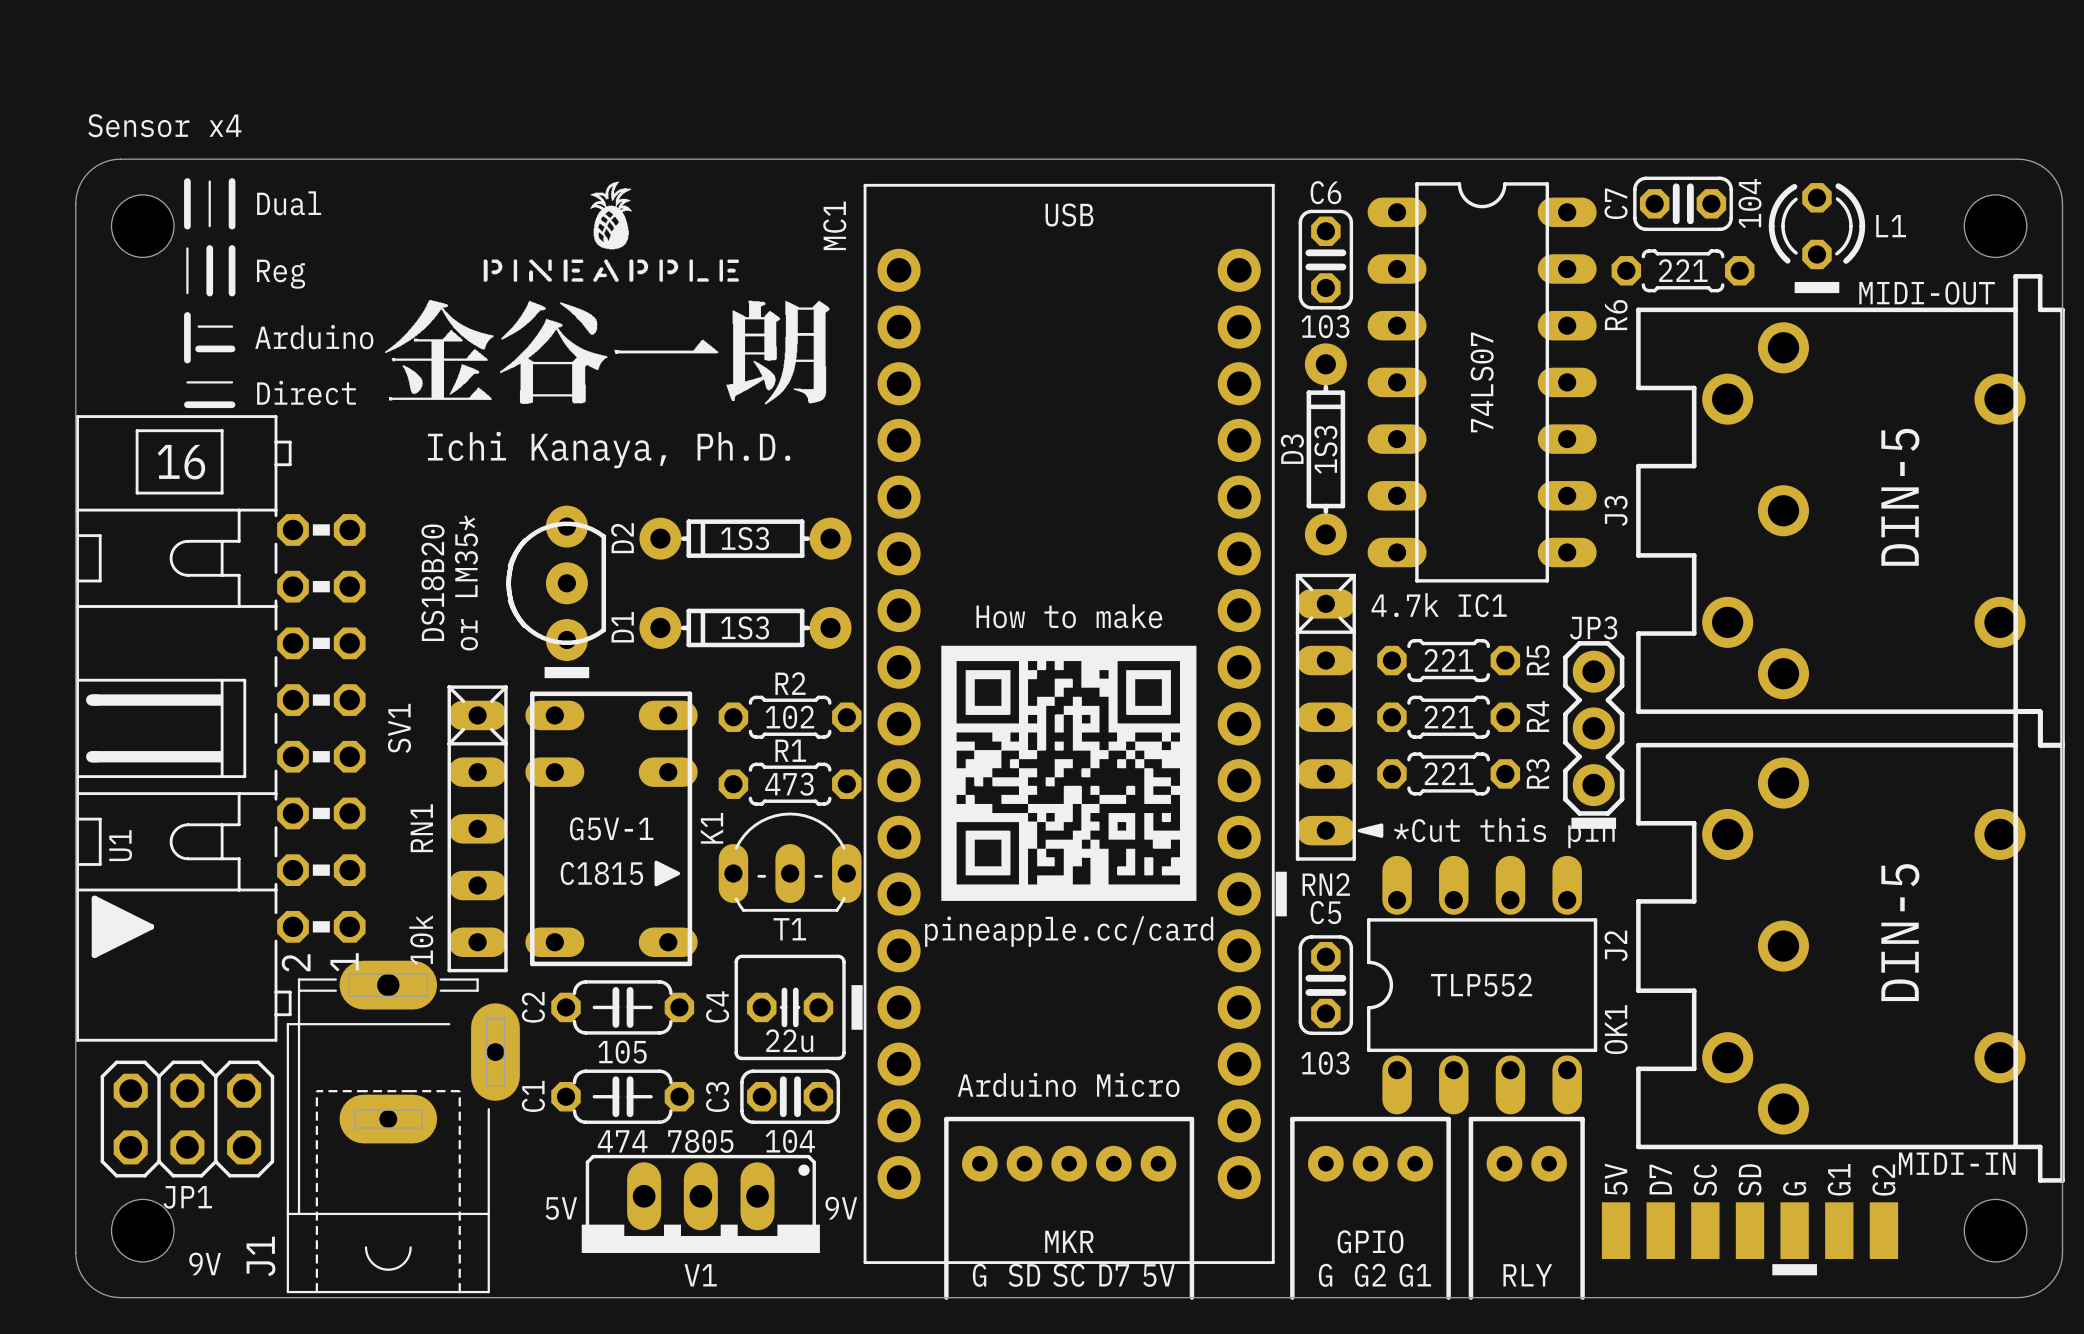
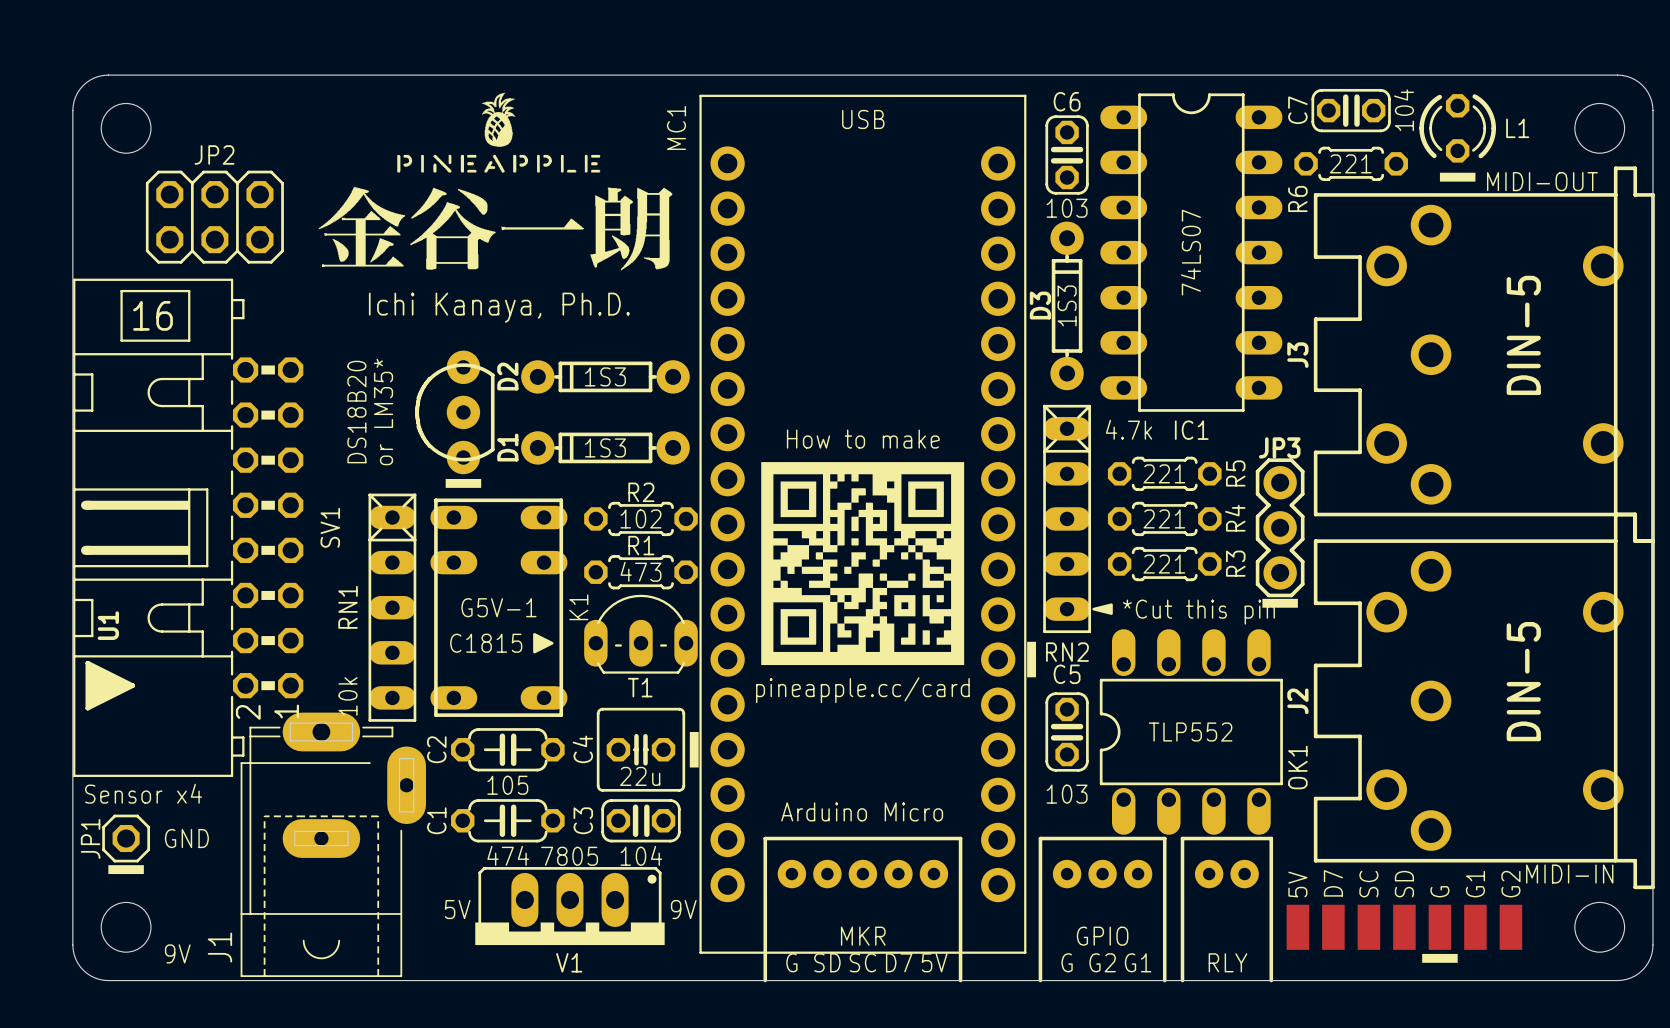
text: Sensor x4 (164, 125) -> none
line: (187, 181) (187, 226) -> none
line: (209, 181) (209, 226) -> none
line: (232, 181) (232, 226) -> none
text: Dual (289, 203) -> none
line: (187, 248) (187, 293) -> none
line: (209, 248) (209, 293) -> none
line: (232, 248) (232, 293) -> none
text: Reg (281, 274) -> none
line: (187, 315) (187, 360) -> none
line: (198, 326) (232, 326) -> none
JP2: none -> (214, 217)
text: Arduino (314, 337) -> none
line: (198, 348) (232, 348) -> none
line: (187, 382) (232, 382) -> none
text: Direct (306, 392) -> none
line: (187, 404) (232, 404) -> none
JP1 footprint: [100, 1060, 275, 1178] -> [102, 814, 151, 863]
text: none -> Sensor x4 (143, 793)
text: none -> GND (186, 838)
drawing: none -> [108, 865, 144, 875]
JP1 name position: JP1 (187, 1197) -> JP1 (90, 838)

